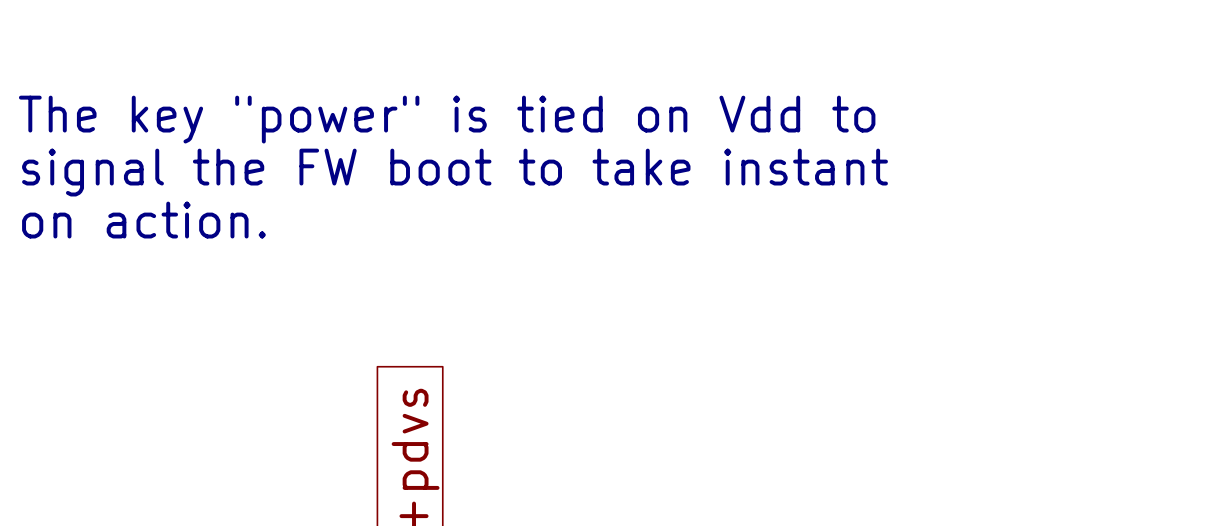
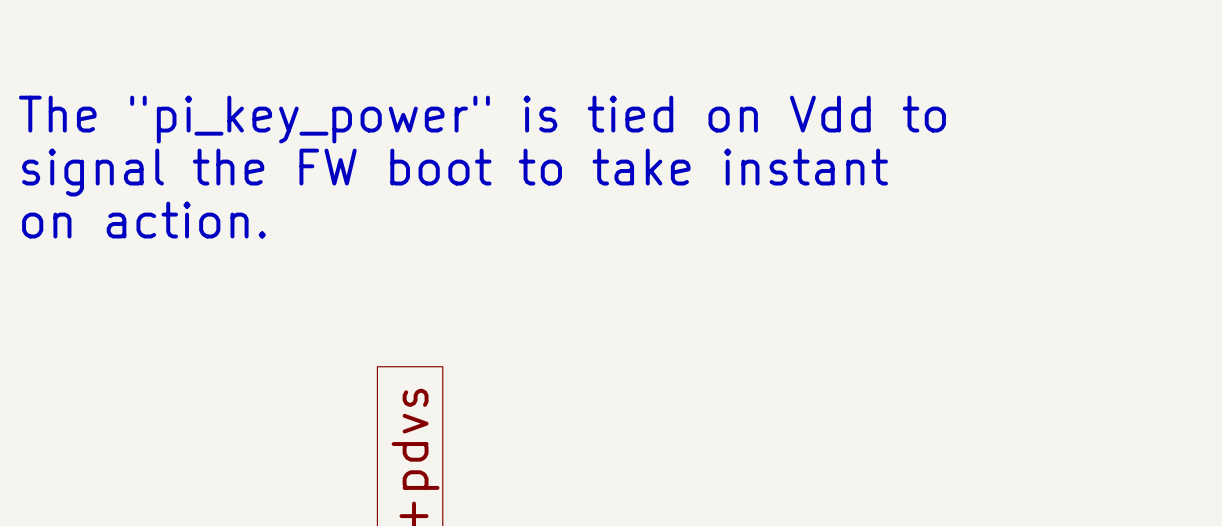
text: The key "power" is tied on Vdd to (447, 119) -> The "pi_key_power" is tied on Vdd to (482, 119)

